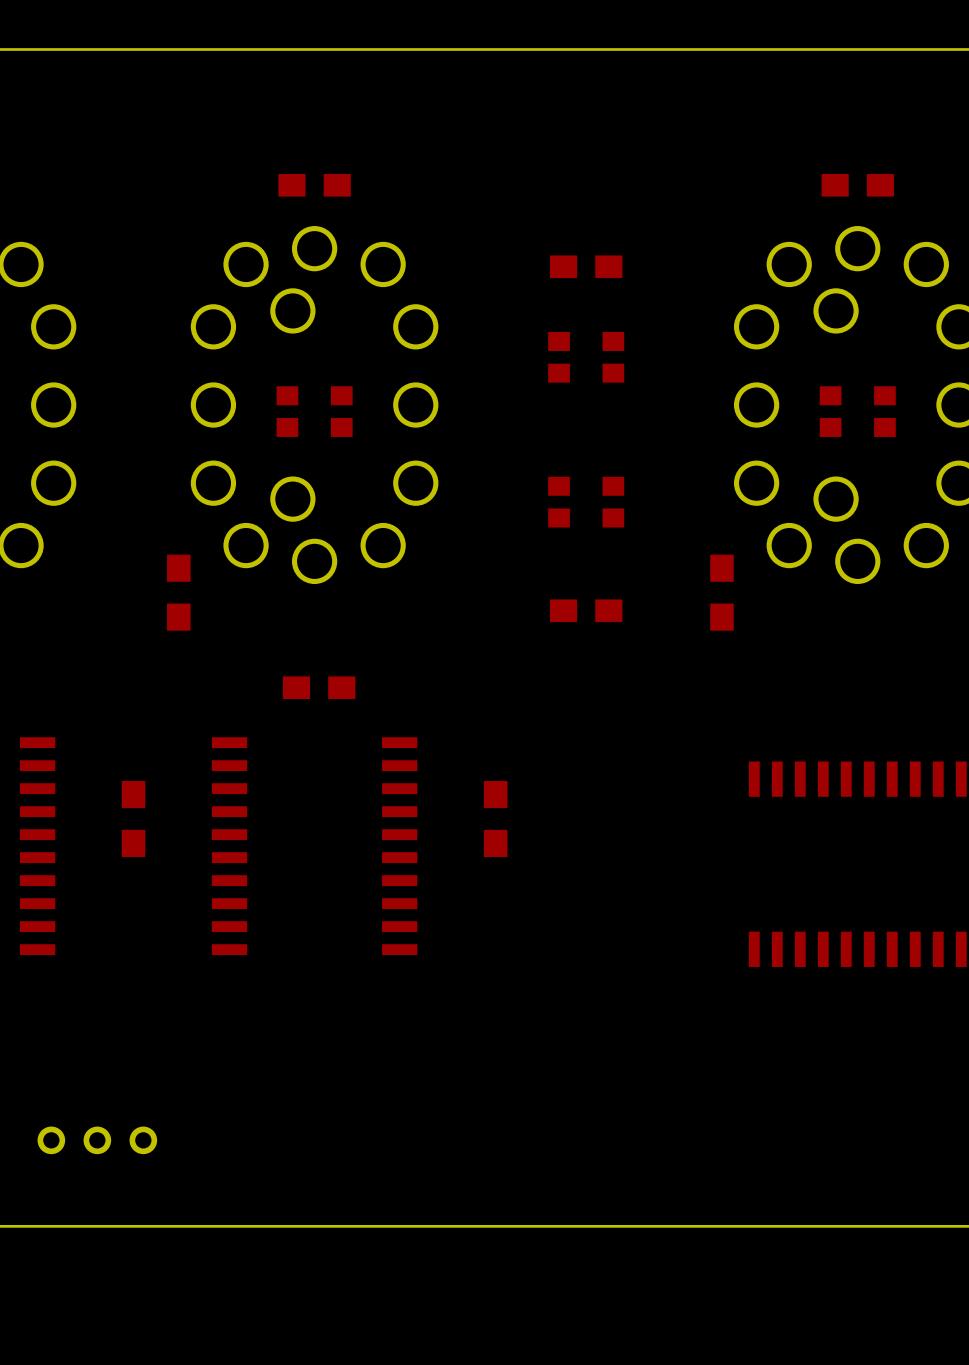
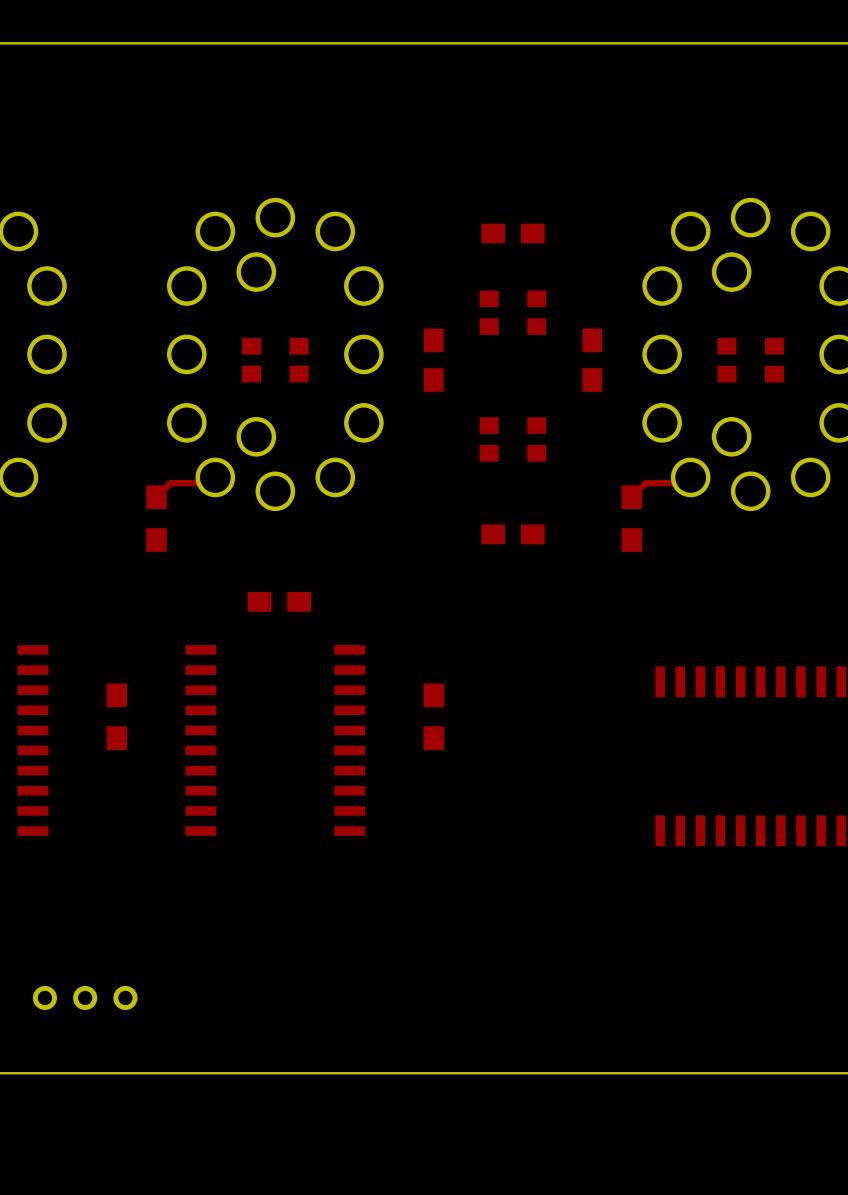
part: (314, 185) -> none
part: (857, 185) -> none
part: none -> (433, 360)
part: none -> (592, 360)
top track: none -> (215, 483) (170, 483) (156, 497)
top track: none -> (690, 483) (645, 483) (631, 497)

